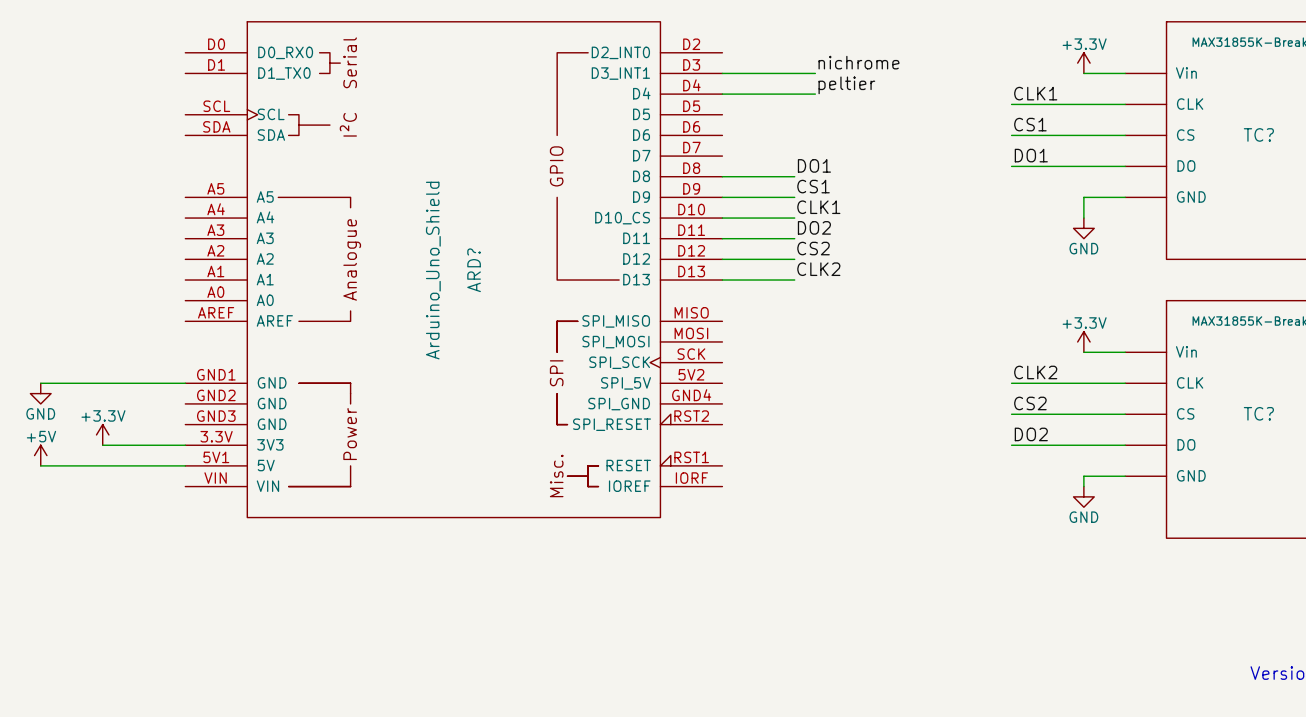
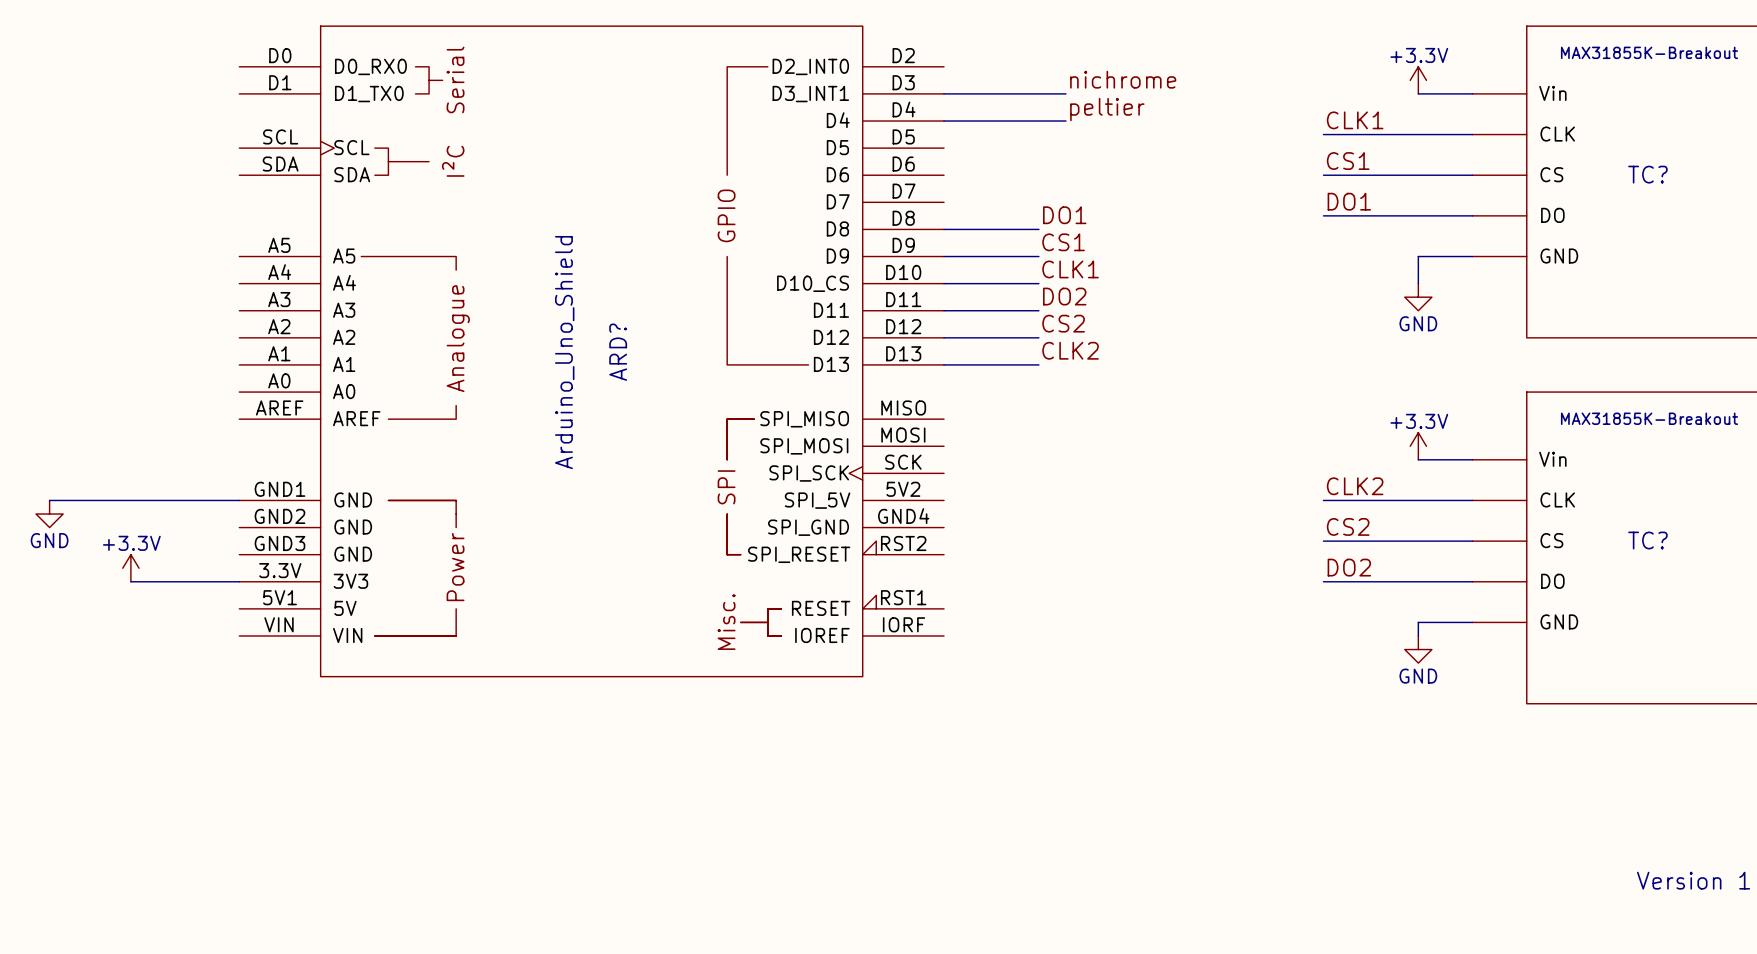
power symbol: +5V (40, 455) -> none
wire: (40, 465) (185, 465) -> none

